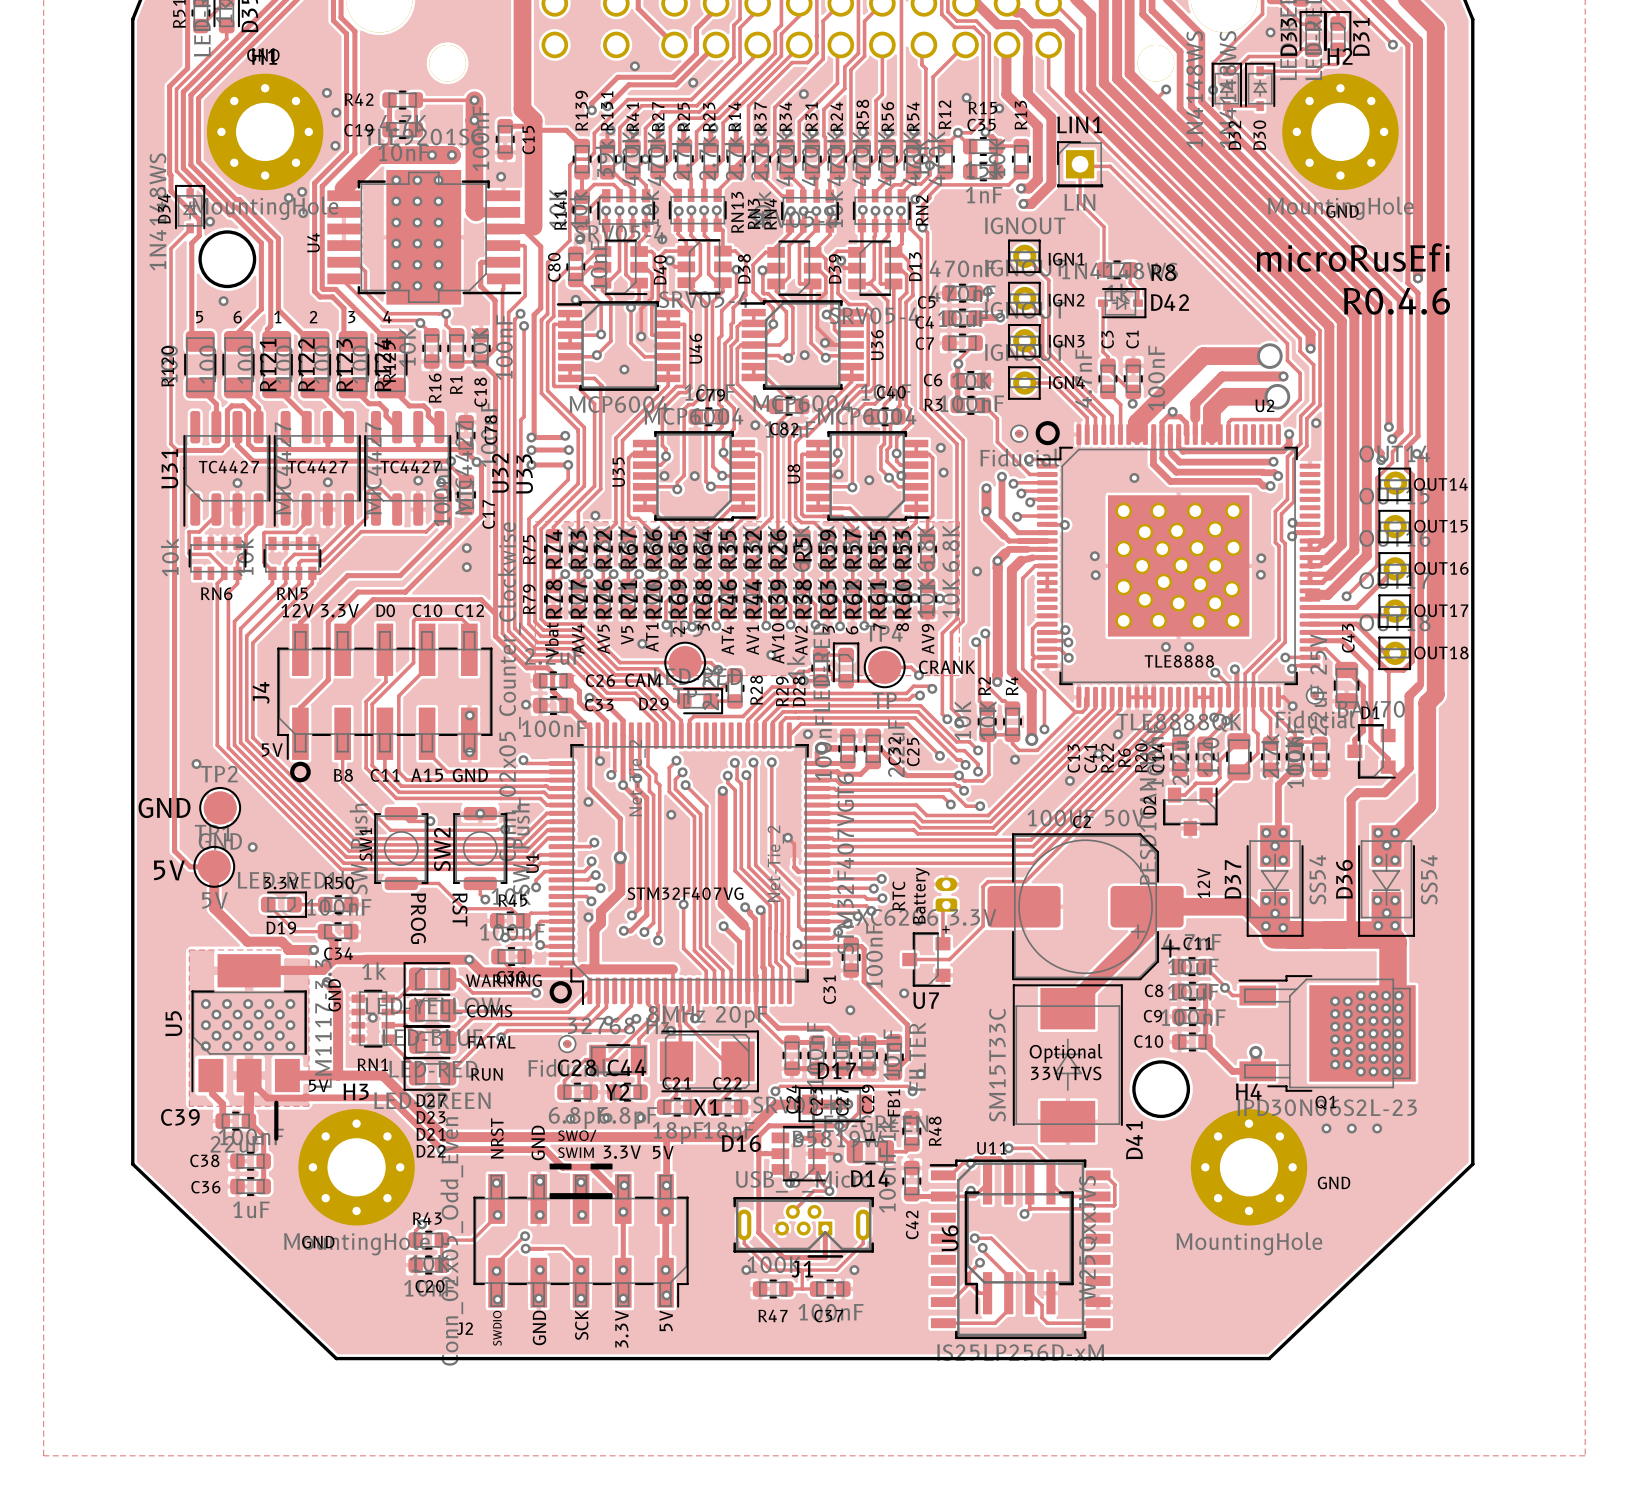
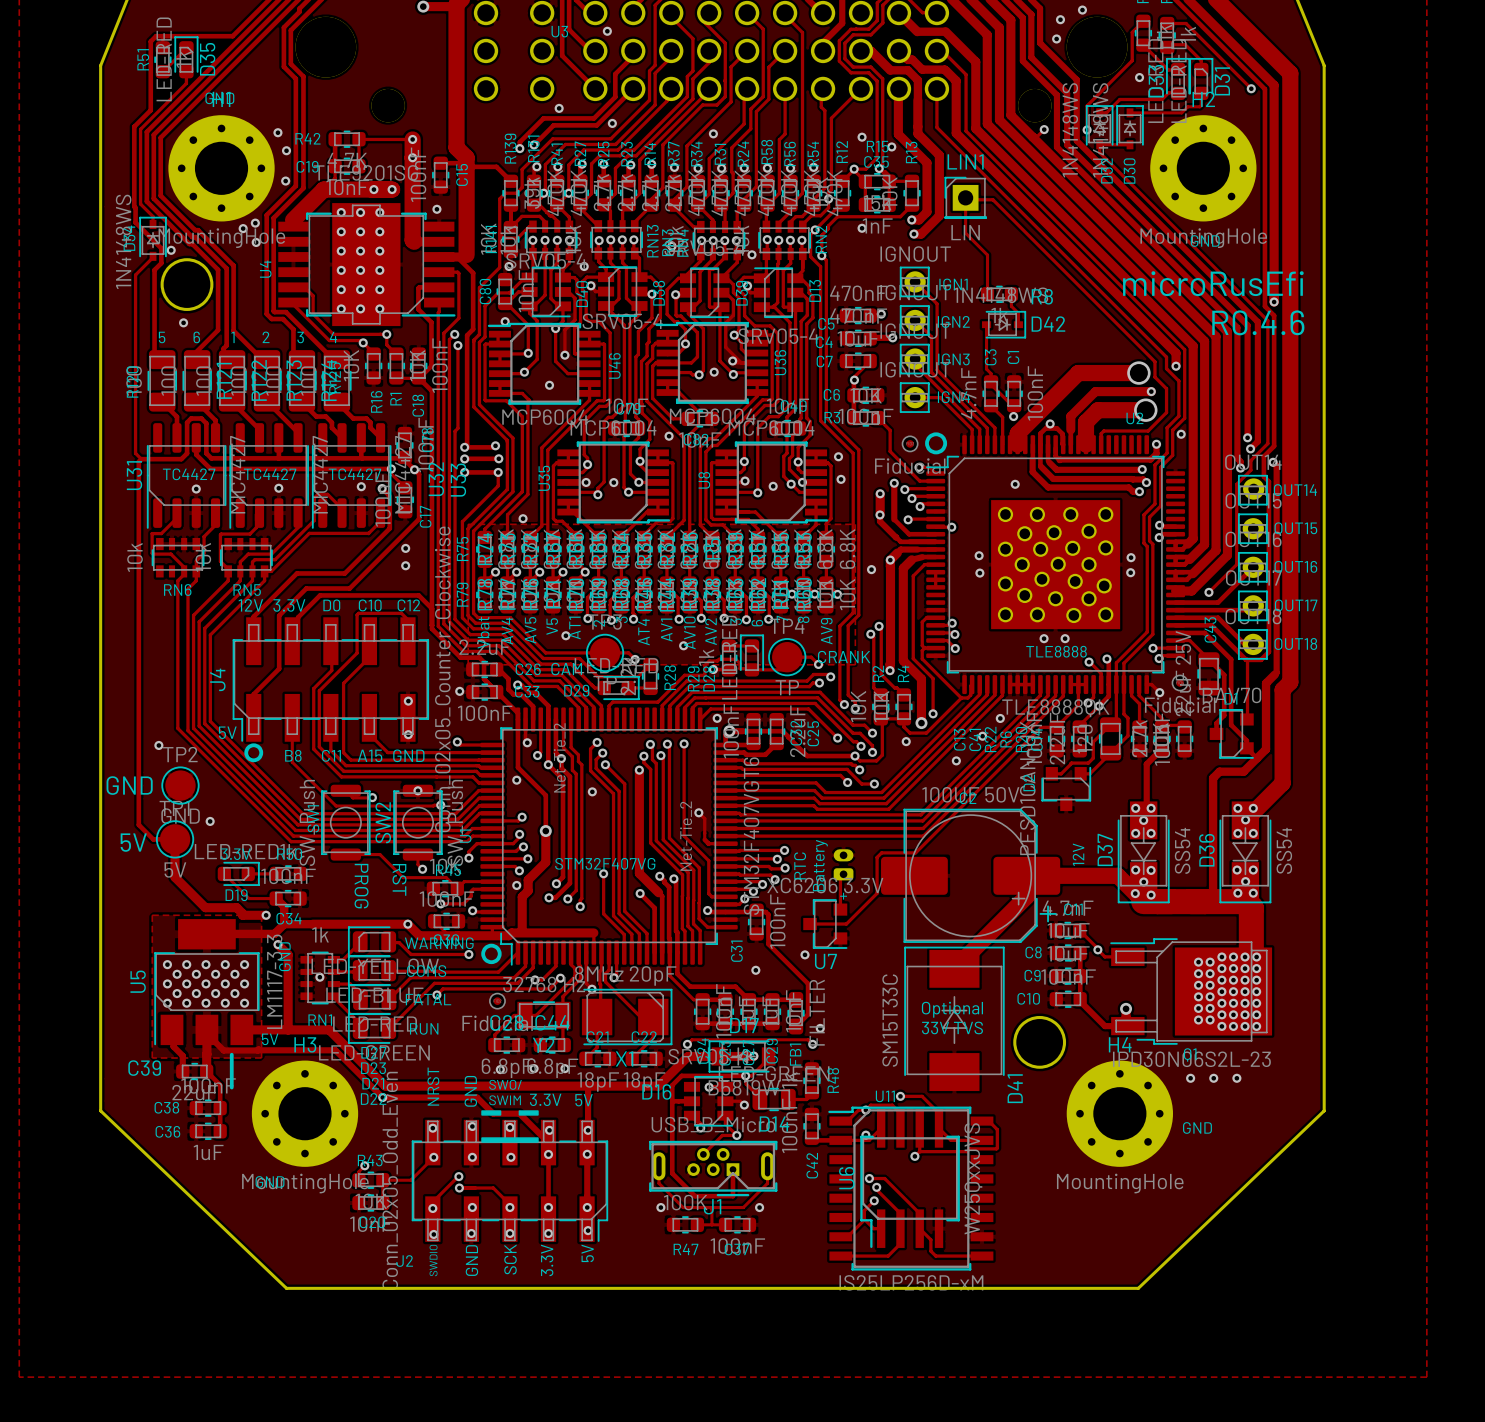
via: none -> (862, 228)
via: none -> (751, 254)

